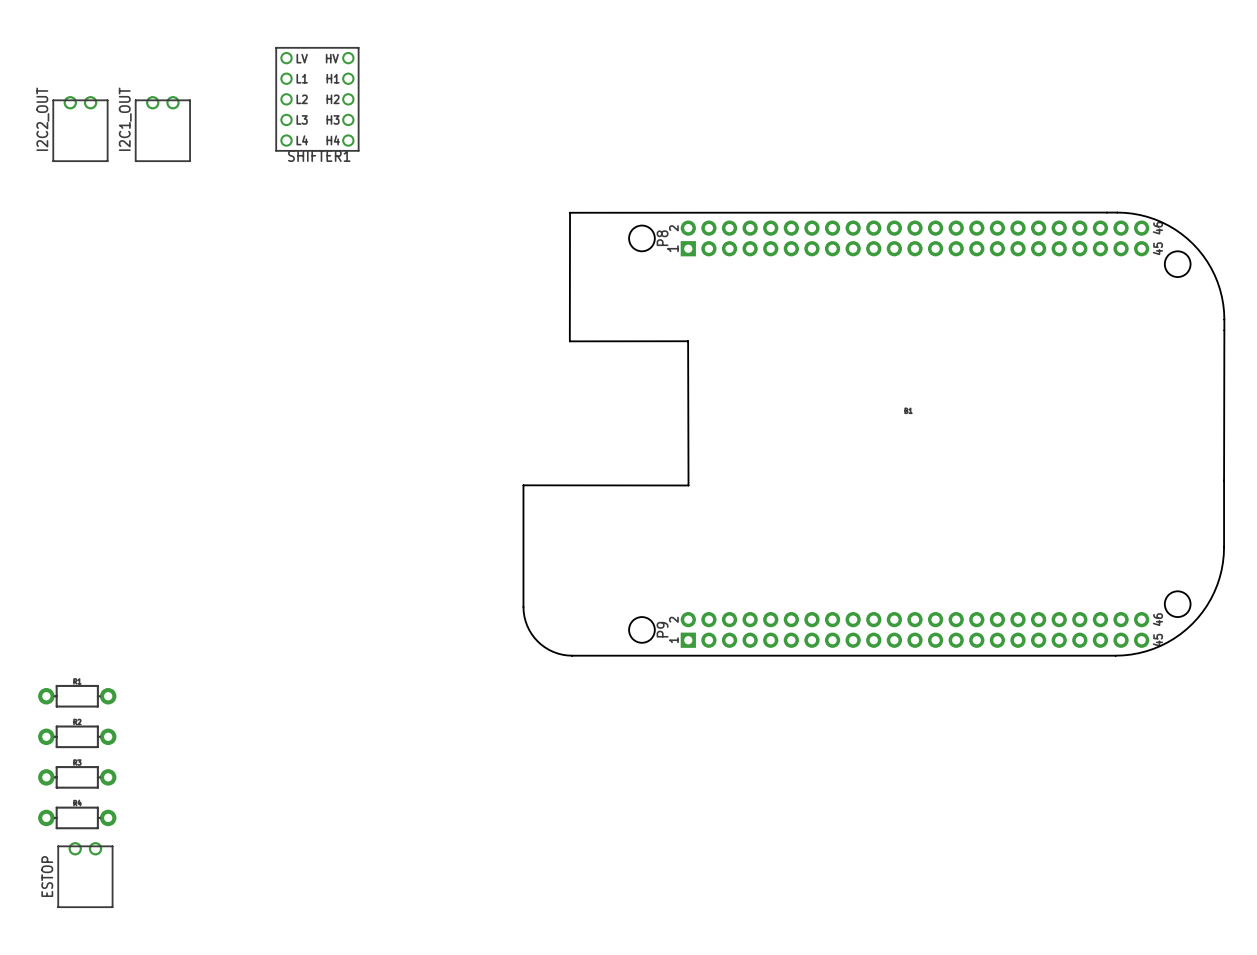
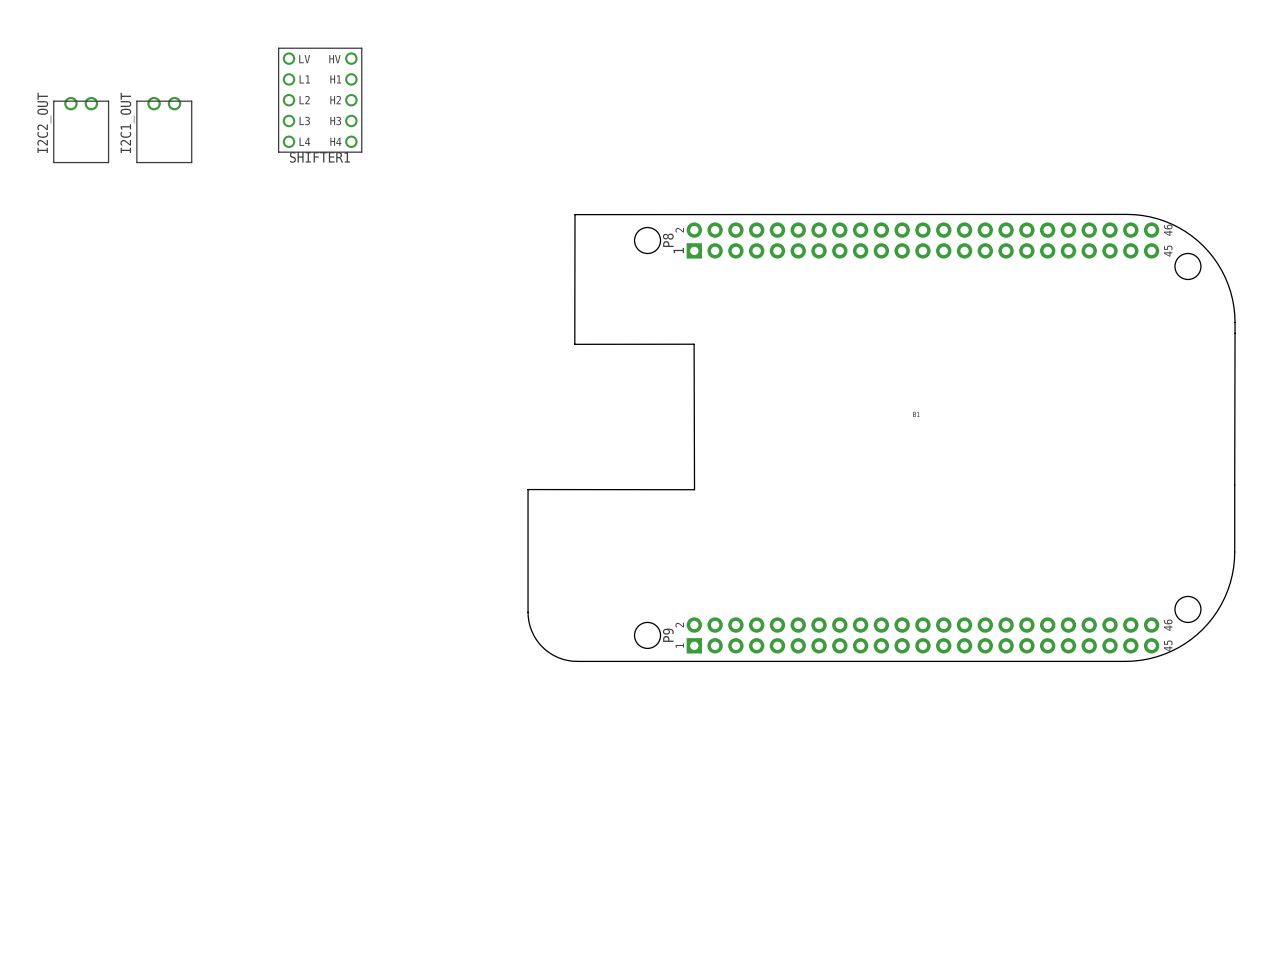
part: (77, 696) -> none
part: (77, 736) -> none
part: (77, 777) -> none
part: (77, 817) -> none
ESTOP: (85, 874) -> none

